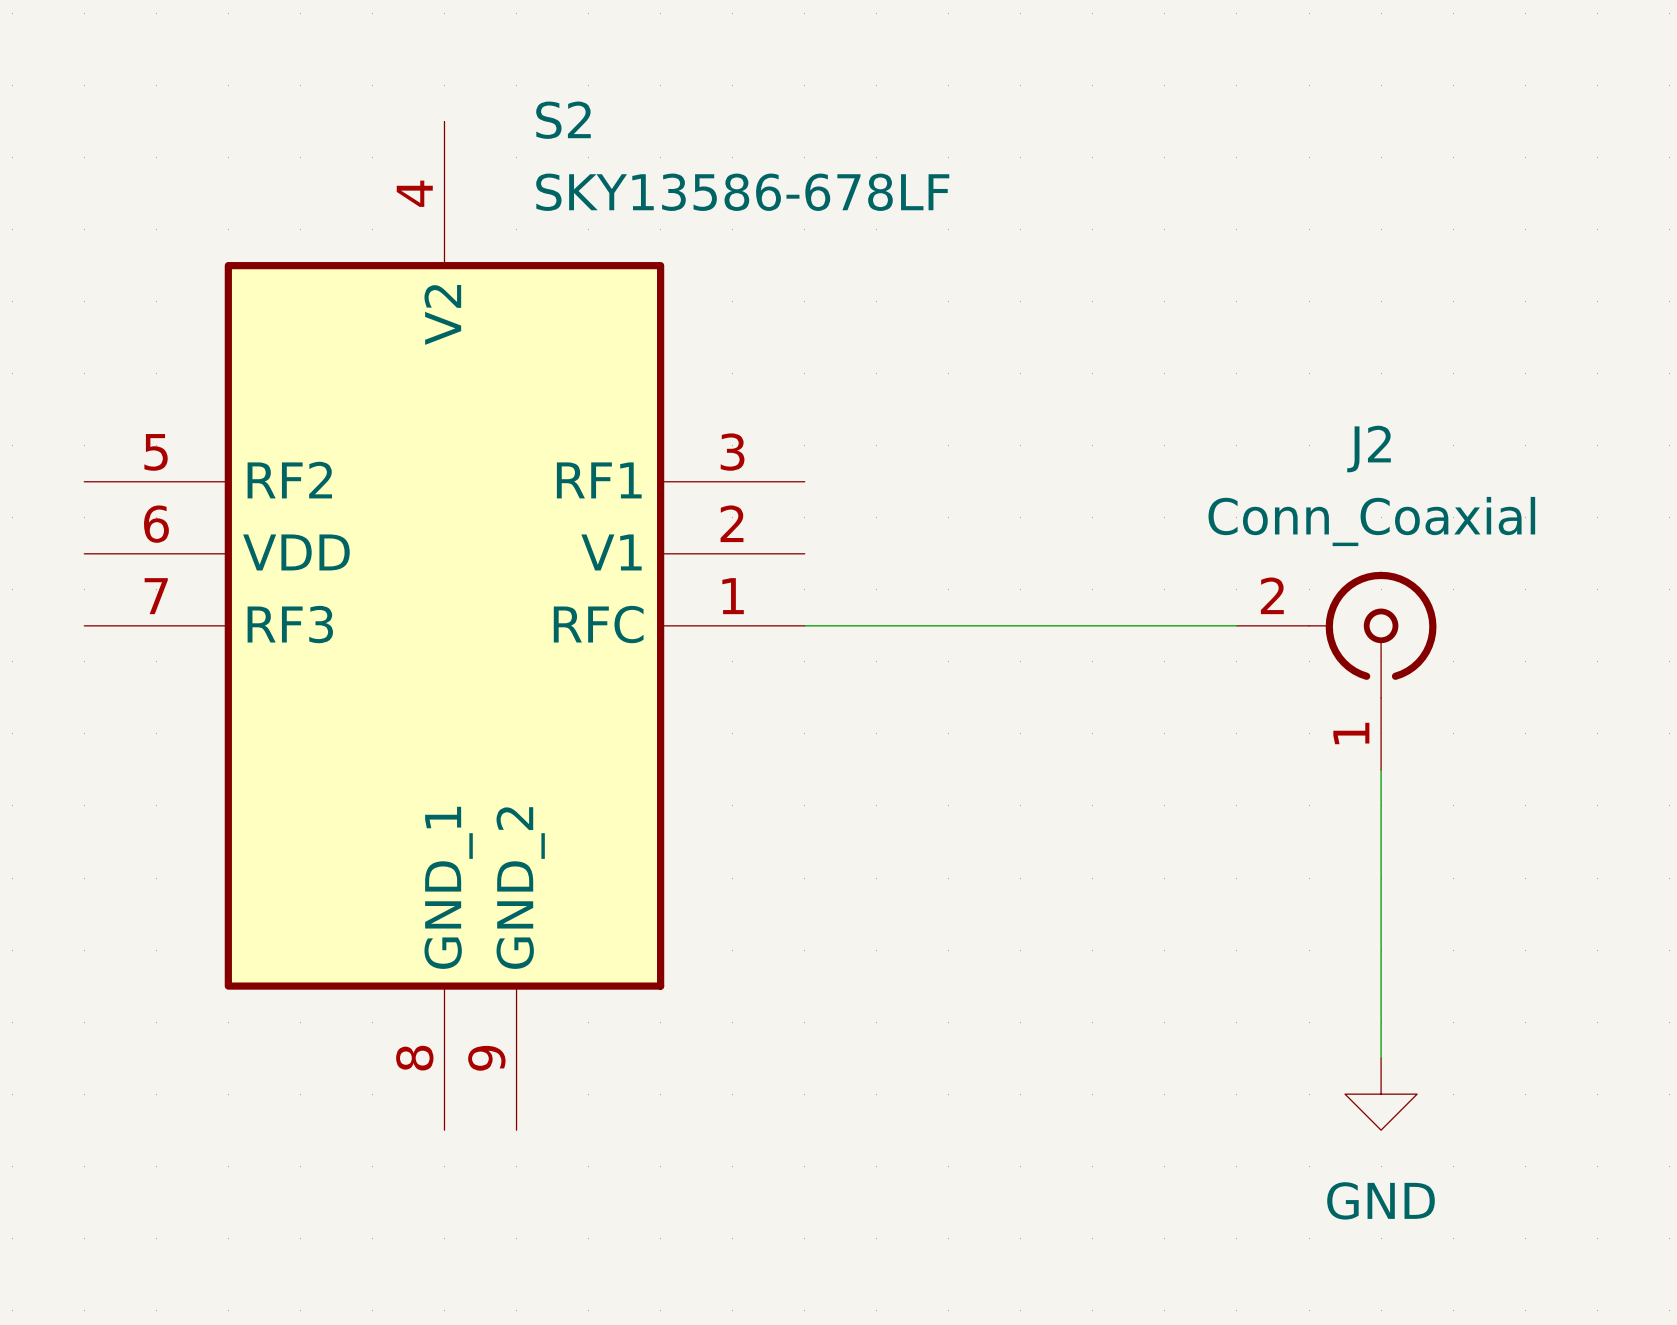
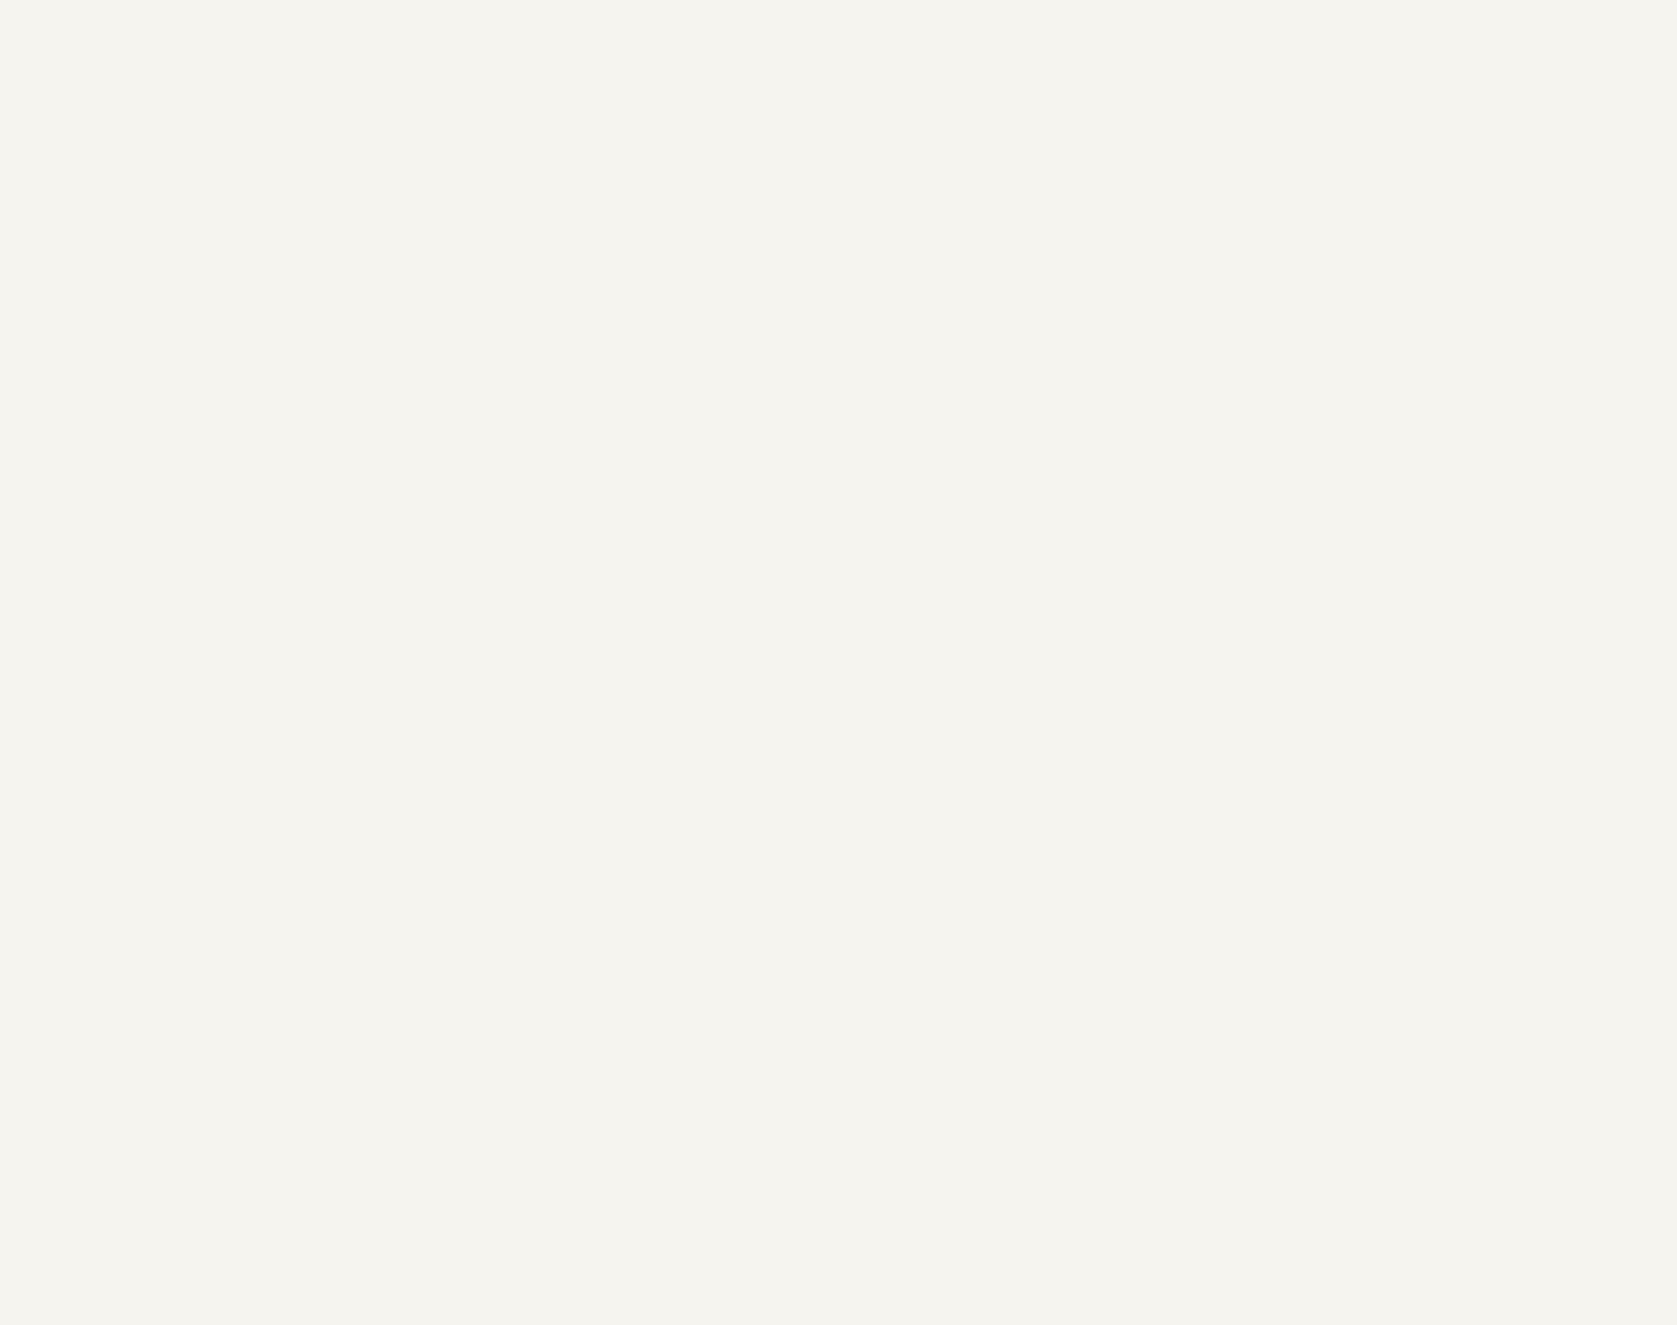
S2: SKY13586-678LF (444, 625) -> none
wire: (804, 625) (1236, 625) -> none
J2: Conn_Coaxial (1336, 670) -> none
wire: (1381, 769) (1381, 1058) -> none
power symbol: GND (1381, 1094) -> none

